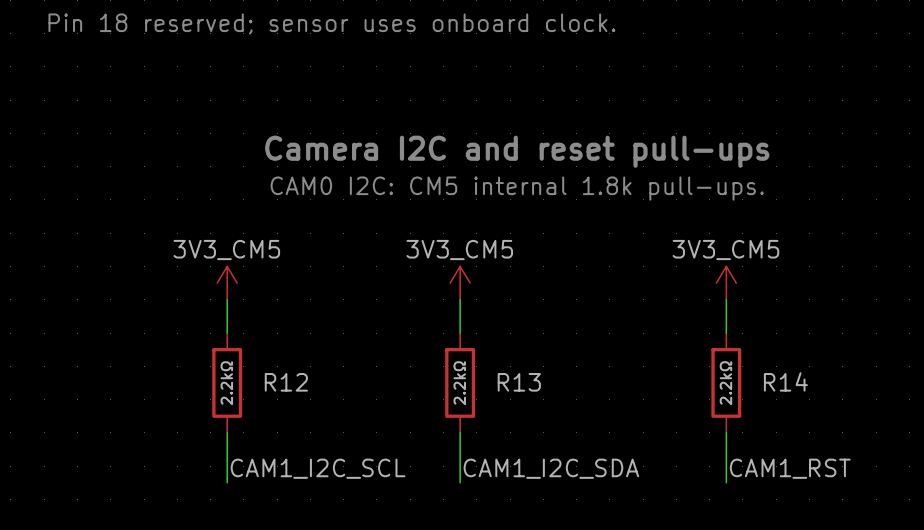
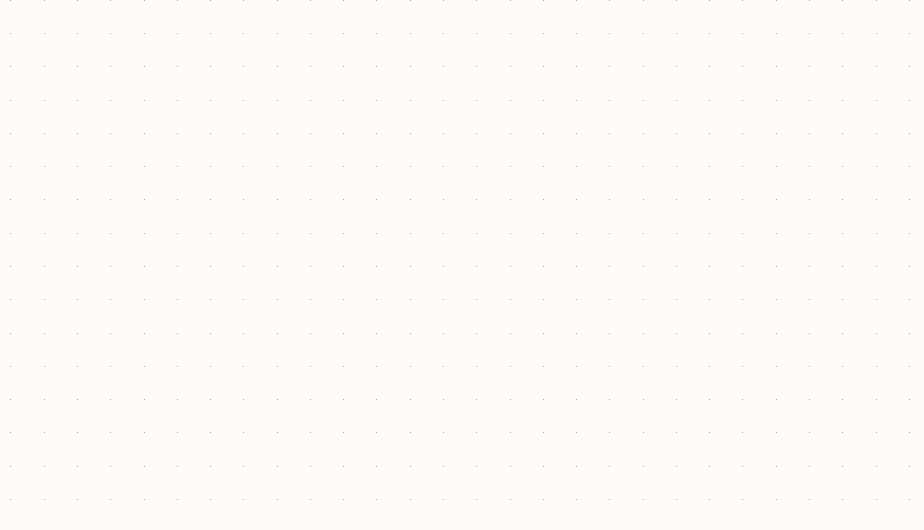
text: Pin 18 reserved; sensor uses onboard clock. (331, 23) -> none
text: Camera I2C and reset pull-ups (517, 151) -> none
text: CAM0 I2C: CM5 internal 1.8k pull-ups. (517, 188) -> none
power symbol: 3V3_CM5 (227, 283) -> none
power symbol: 3V3_CM5 (460, 283) -> none
power symbol: 3V3_CM5 (726, 283) -> none
wire: (227, 299) (227, 333) -> none
wire: (460, 299) (460, 333) -> none
wire: (726, 299) (726, 333) -> none
R12: 2.2kΩ (227, 382) -> none
R13: 2.2kΩ (460, 382) -> none
R14: 2.2kΩ (726, 382) -> none
wire: (227, 432) (227, 482) -> none
wire: (460, 432) (460, 482) -> none
wire: (726, 432) (726, 482) -> none
label: CAM1_I2C_SCL (318, 468) -> none
label: CAM1_I2C_SDA (551, 468) -> none
label: CAM1_RST (790, 468) -> none

